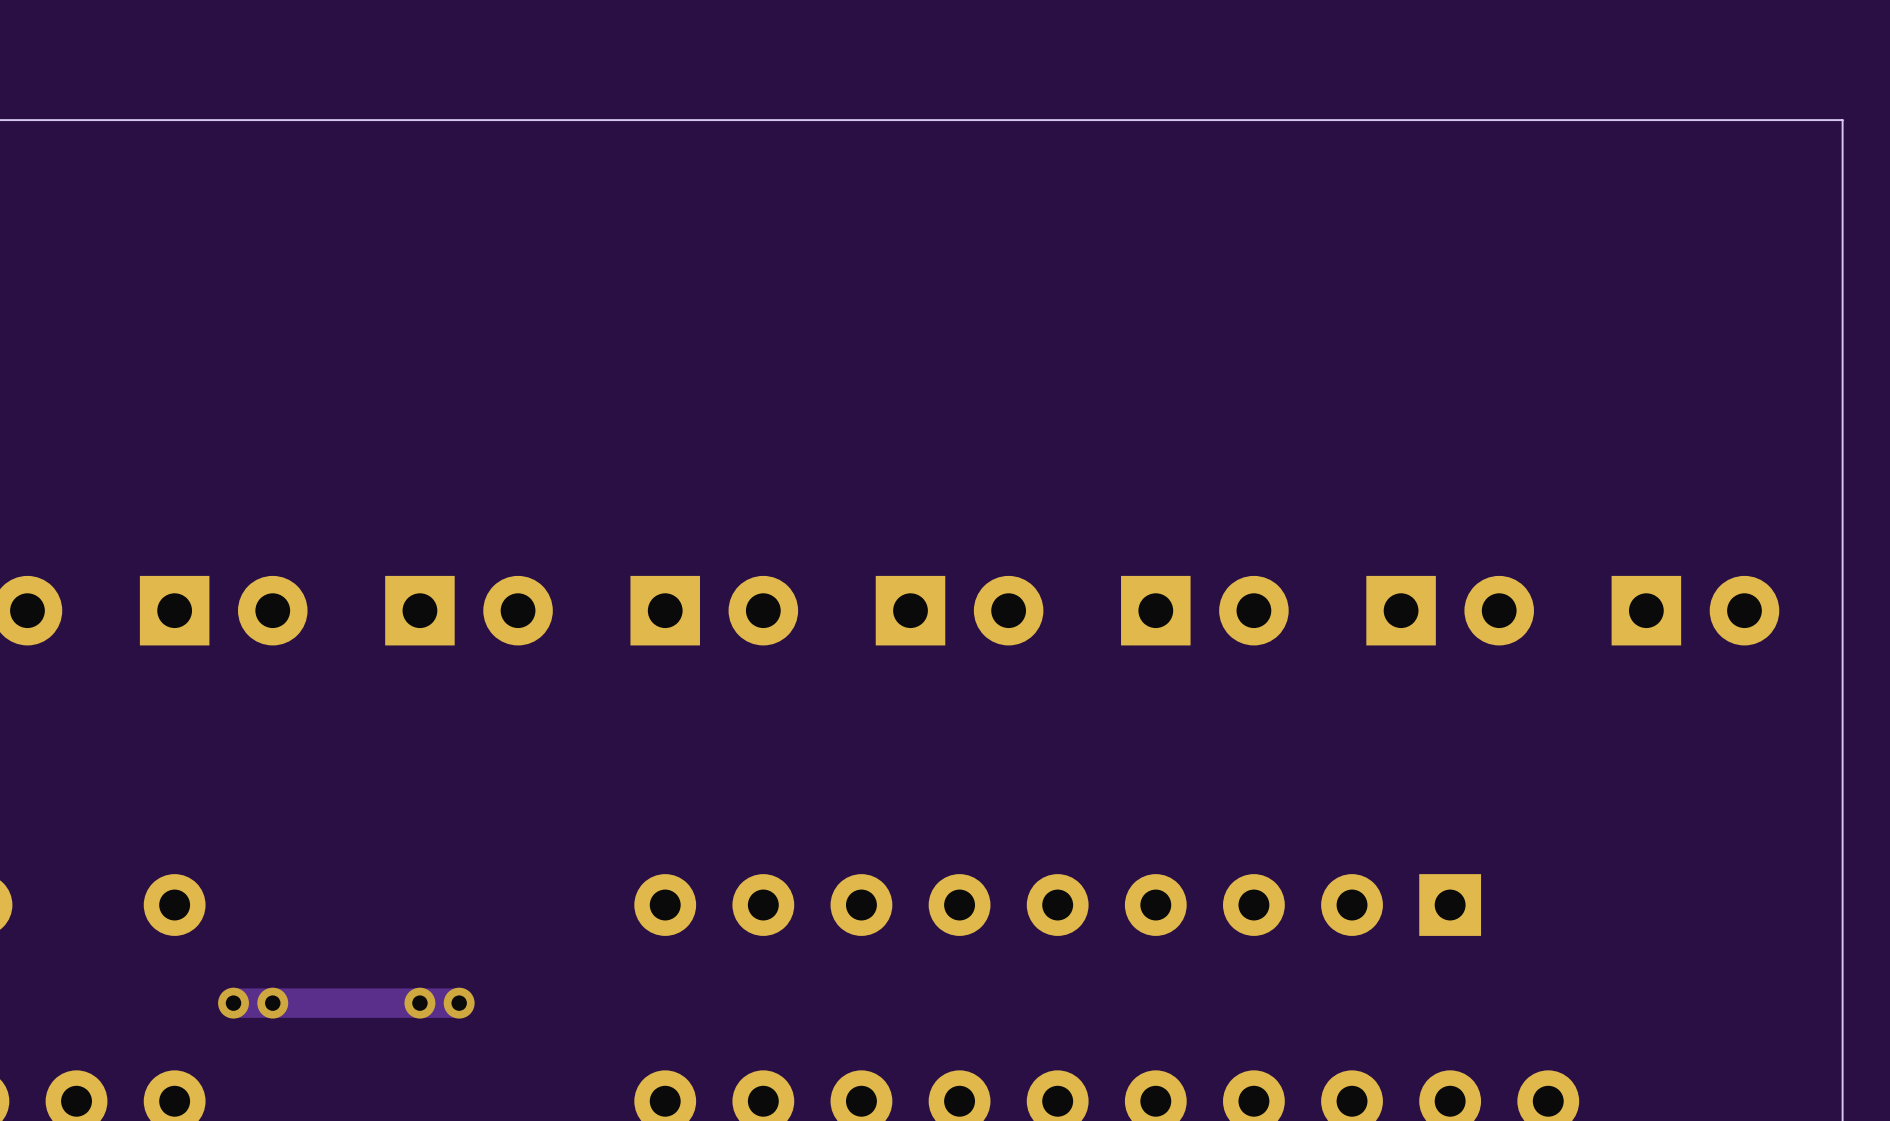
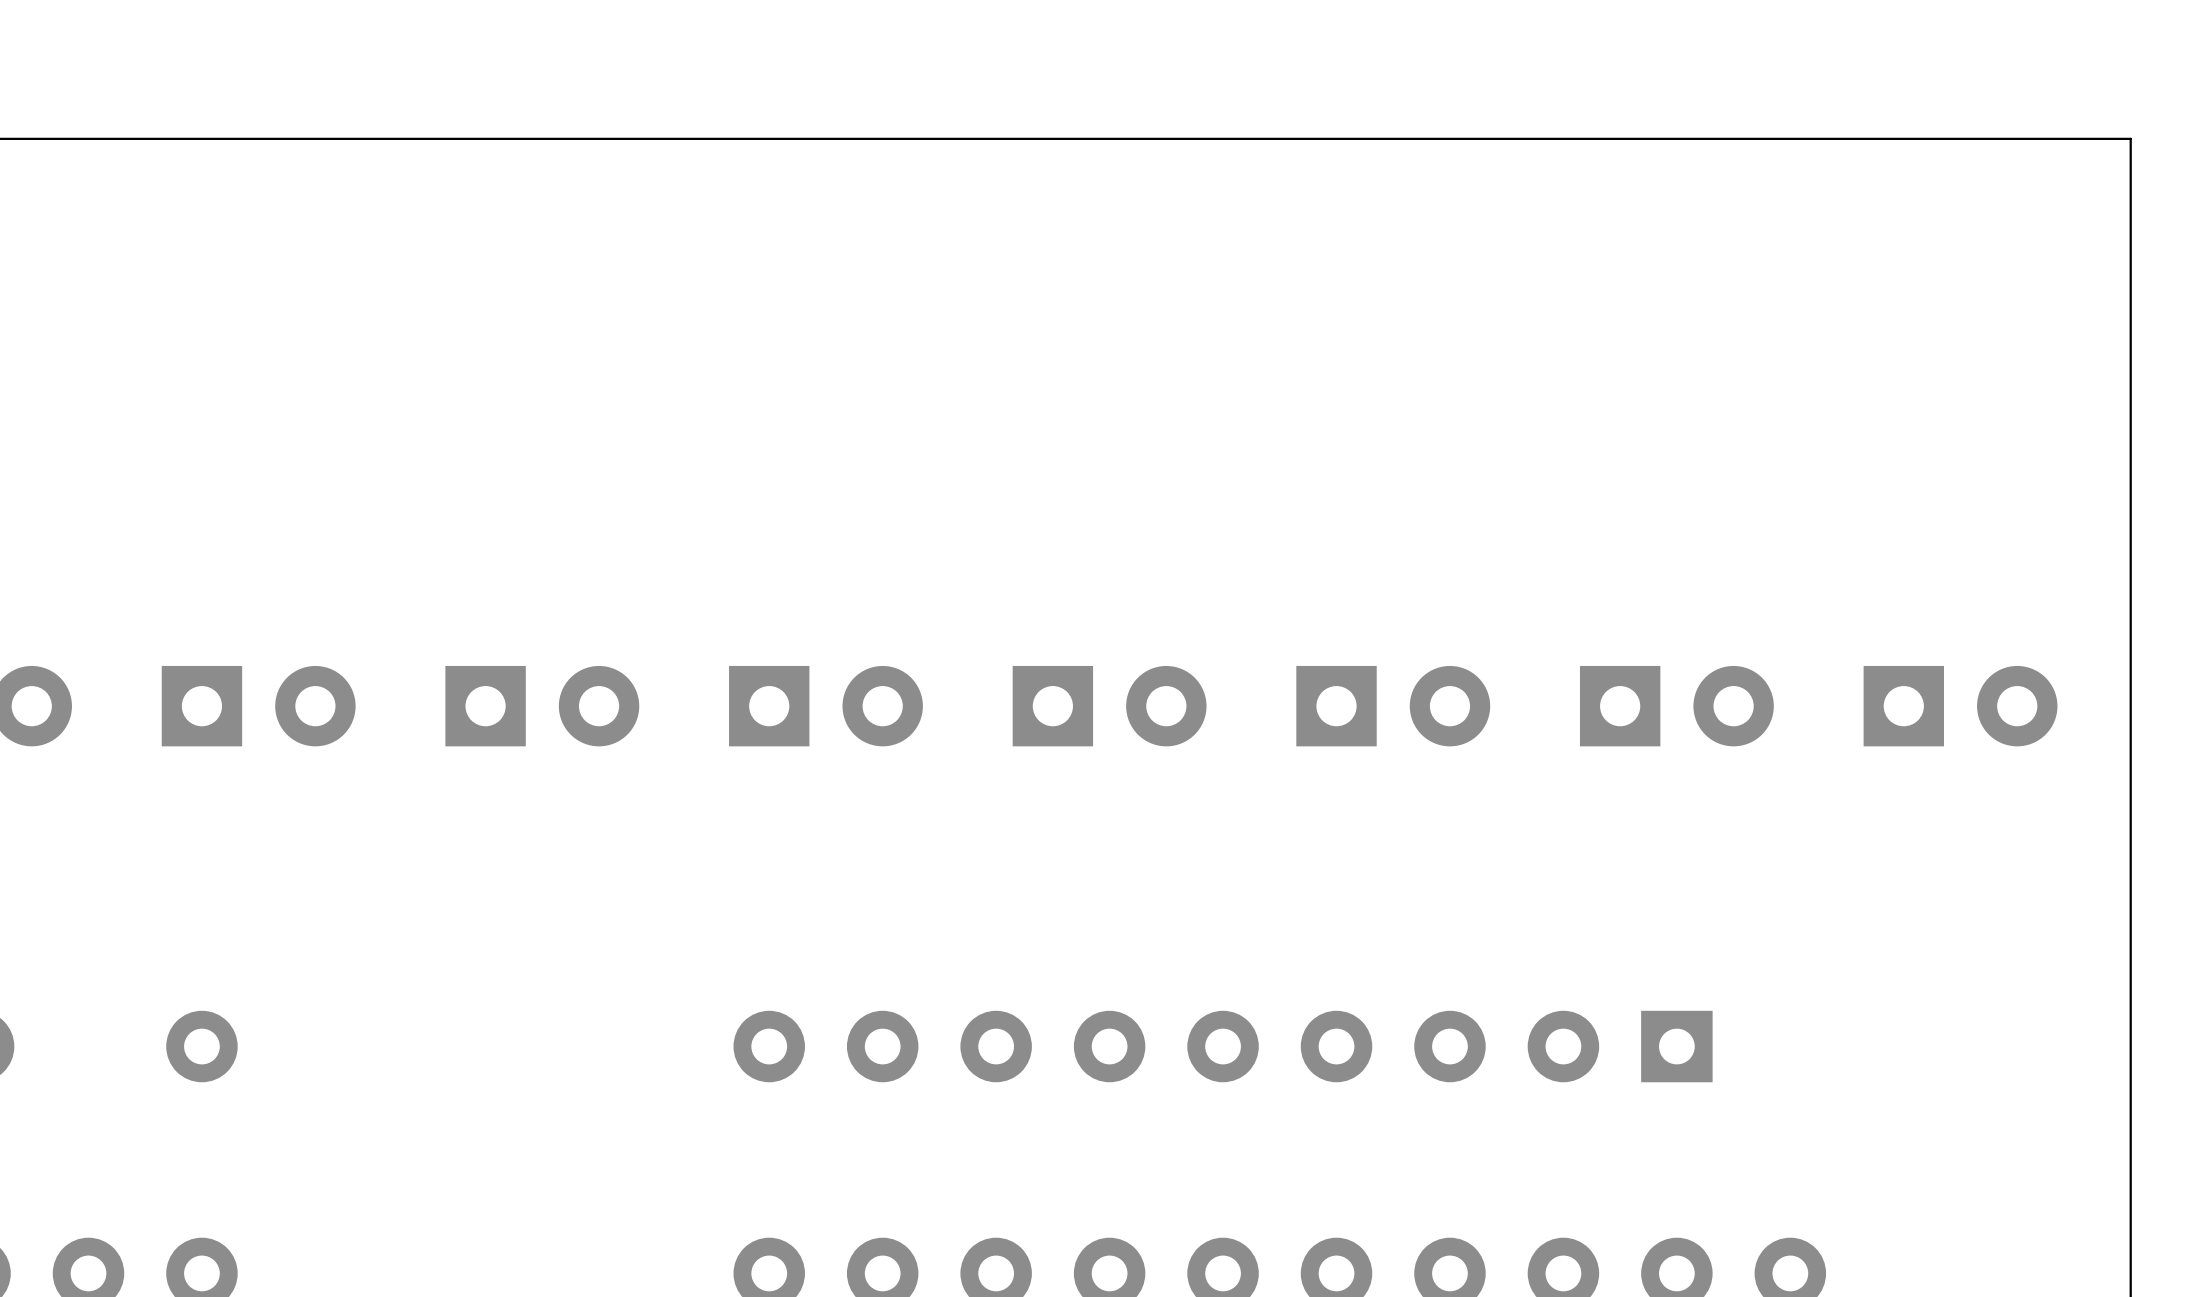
via: (233, 1003) -> none
via: (272, 1003) -> none
via: (419, 1003) -> none
track: (459, 1003) (233, 1003) -> none
via: (459, 1003) -> none

